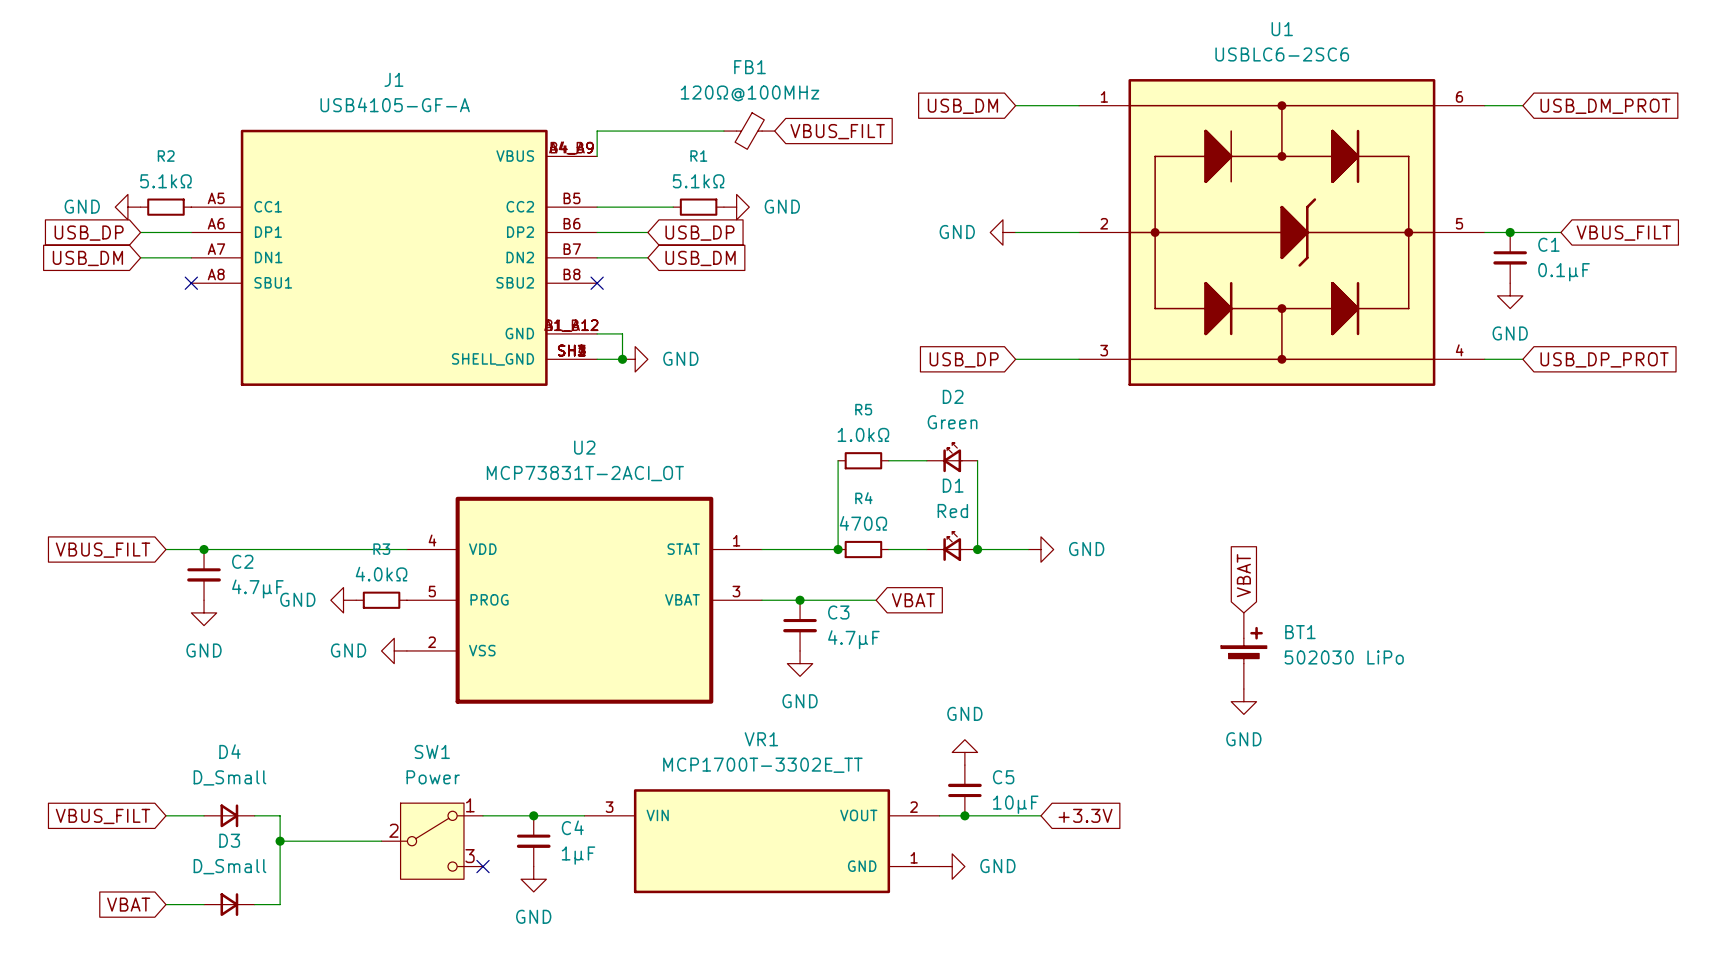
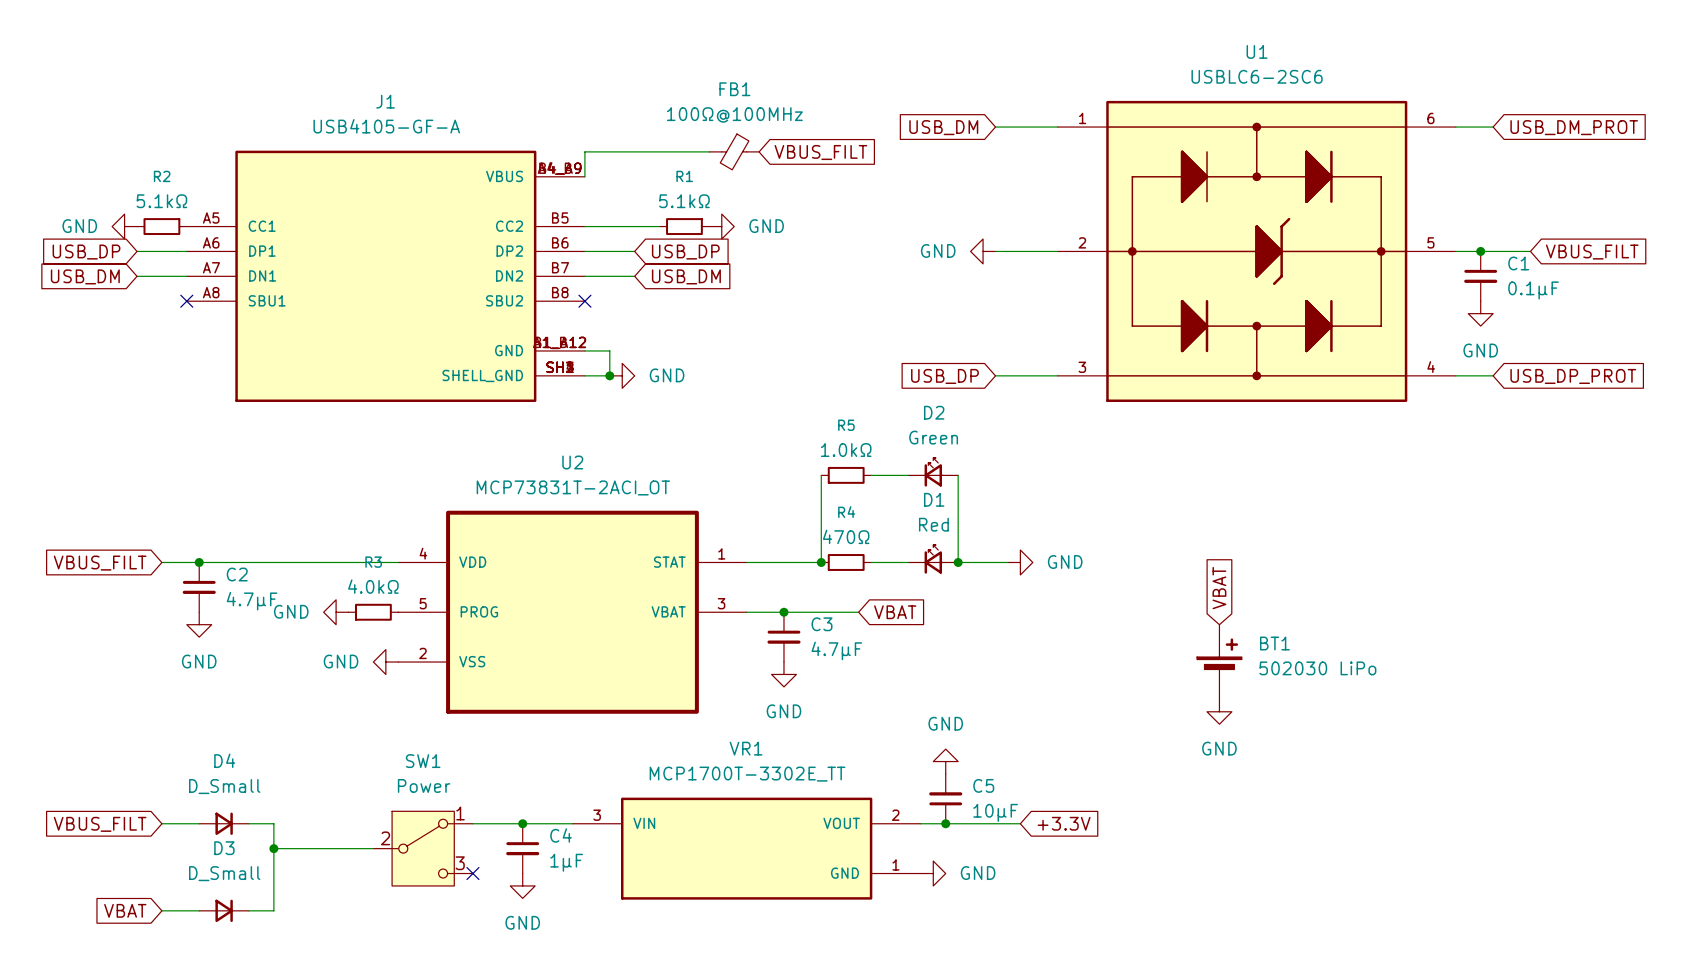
FB1 value: 120Ω@100MHz (749, 93) -> 100Ω@100MHz (734, 115)

